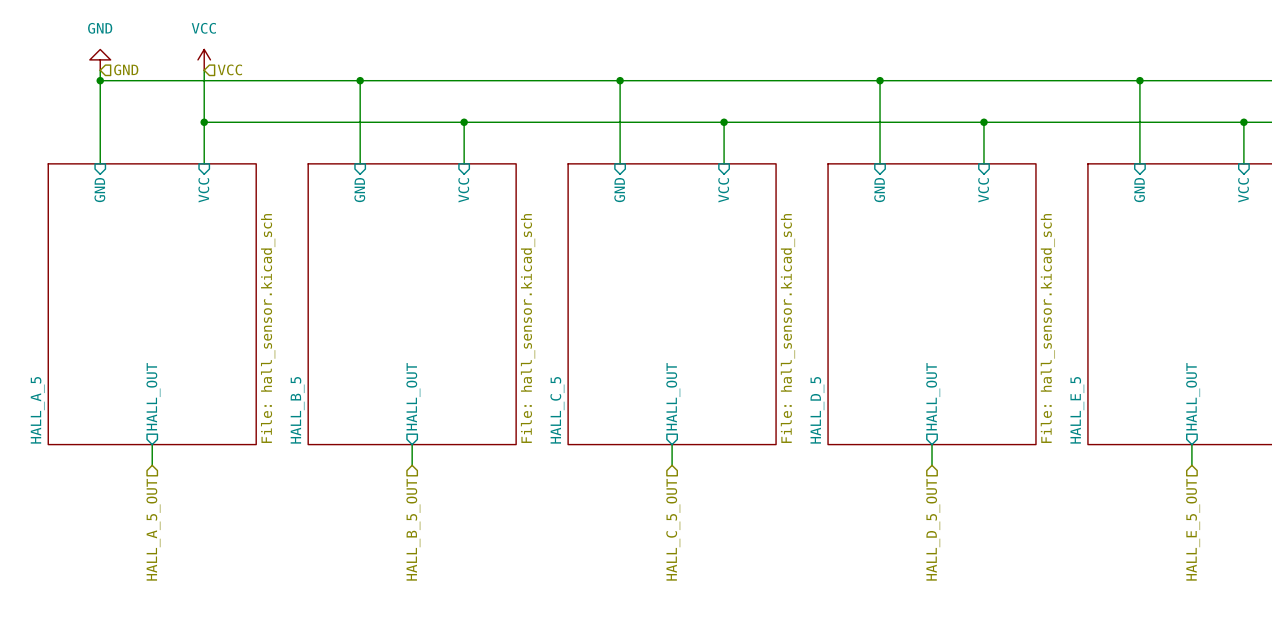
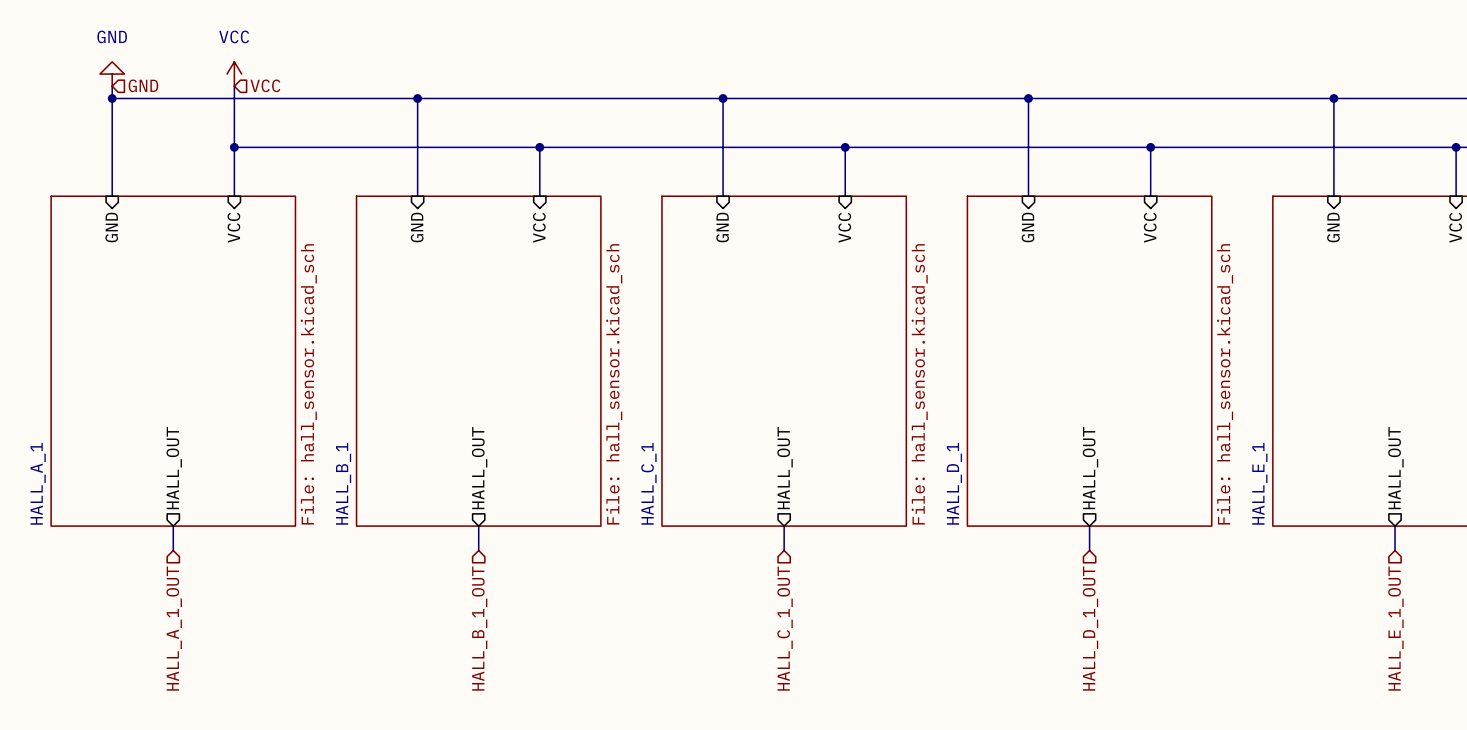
sheet HALL_A_5 name: HALL_A_5 (37, 410) -> HALL_A_1 (38, 483)
sheet HALL_B_5 name: HALL_B_5 (297, 410) -> HALL_B_1 (343, 483)
sheet HALL_C_5 name: HALL_C_5 (557, 410) -> HALL_C_1 (648, 483)
sheet HALL_D_5 name: HALL_D_5 (817, 410) -> HALL_D_1 (954, 483)
sheet HALL_E_5 name: HALL_E_5 (1077, 410) -> HALL_E_1 (1259, 483)
hierarchical label: HALL_A_5_OUT (153, 529) -> HALL_A_1_OUT (174, 628)
hierarchical label: HALL_B_5_OUT (413, 529) -> HALL_B_1_OUT (479, 628)
hierarchical label: HALL_C_5_OUT (673, 529) -> HALL_C_1_OUT (785, 628)
hierarchical label: HALL_D_5_OUT (933, 529) -> HALL_D_1_OUT (1090, 628)
hierarchical label: HALL_E_5_OUT (1193, 529) -> HALL_E_1_OUT (1395, 628)

